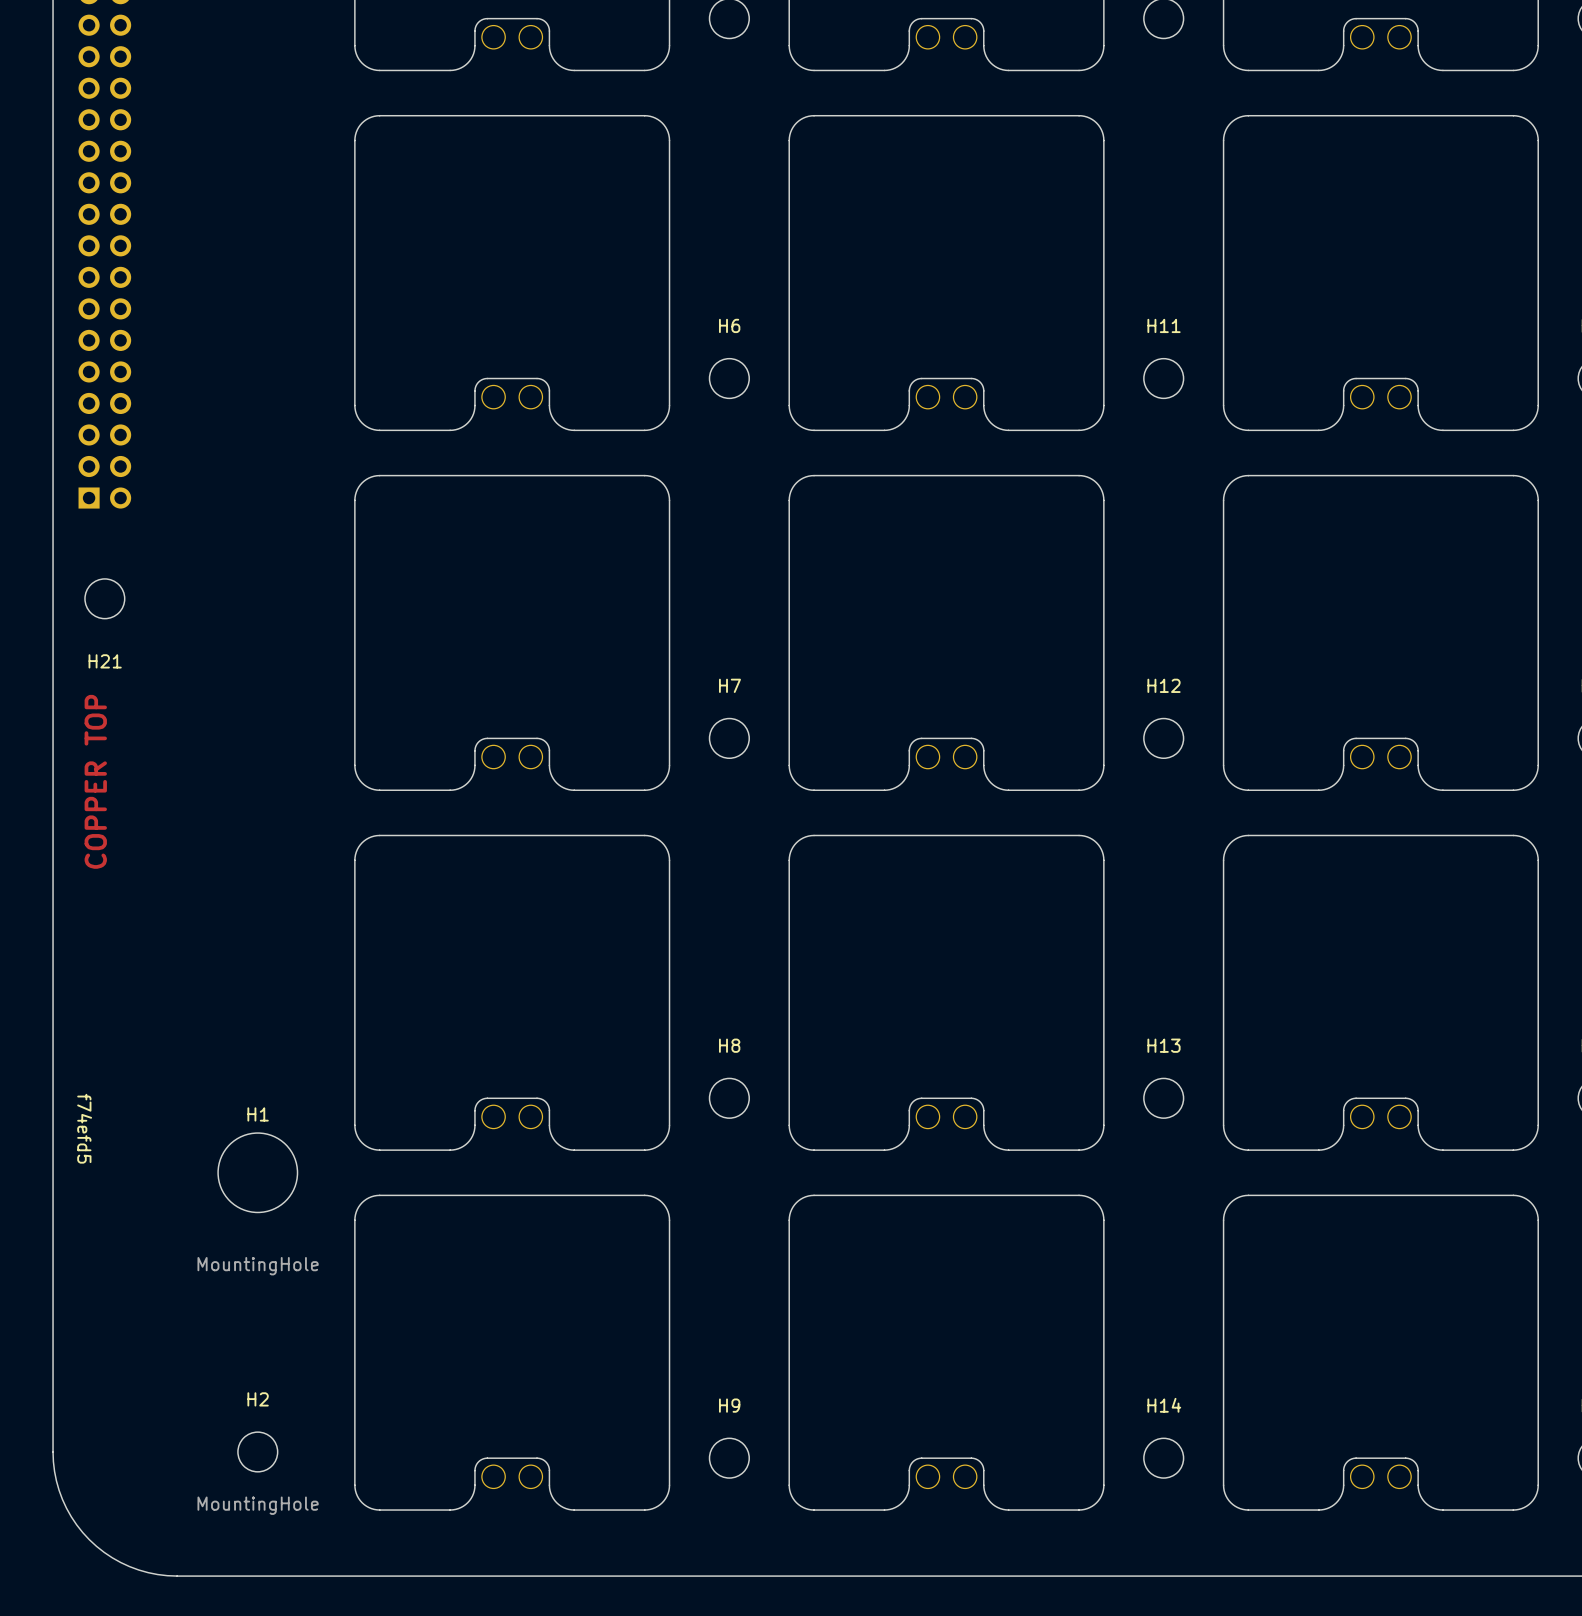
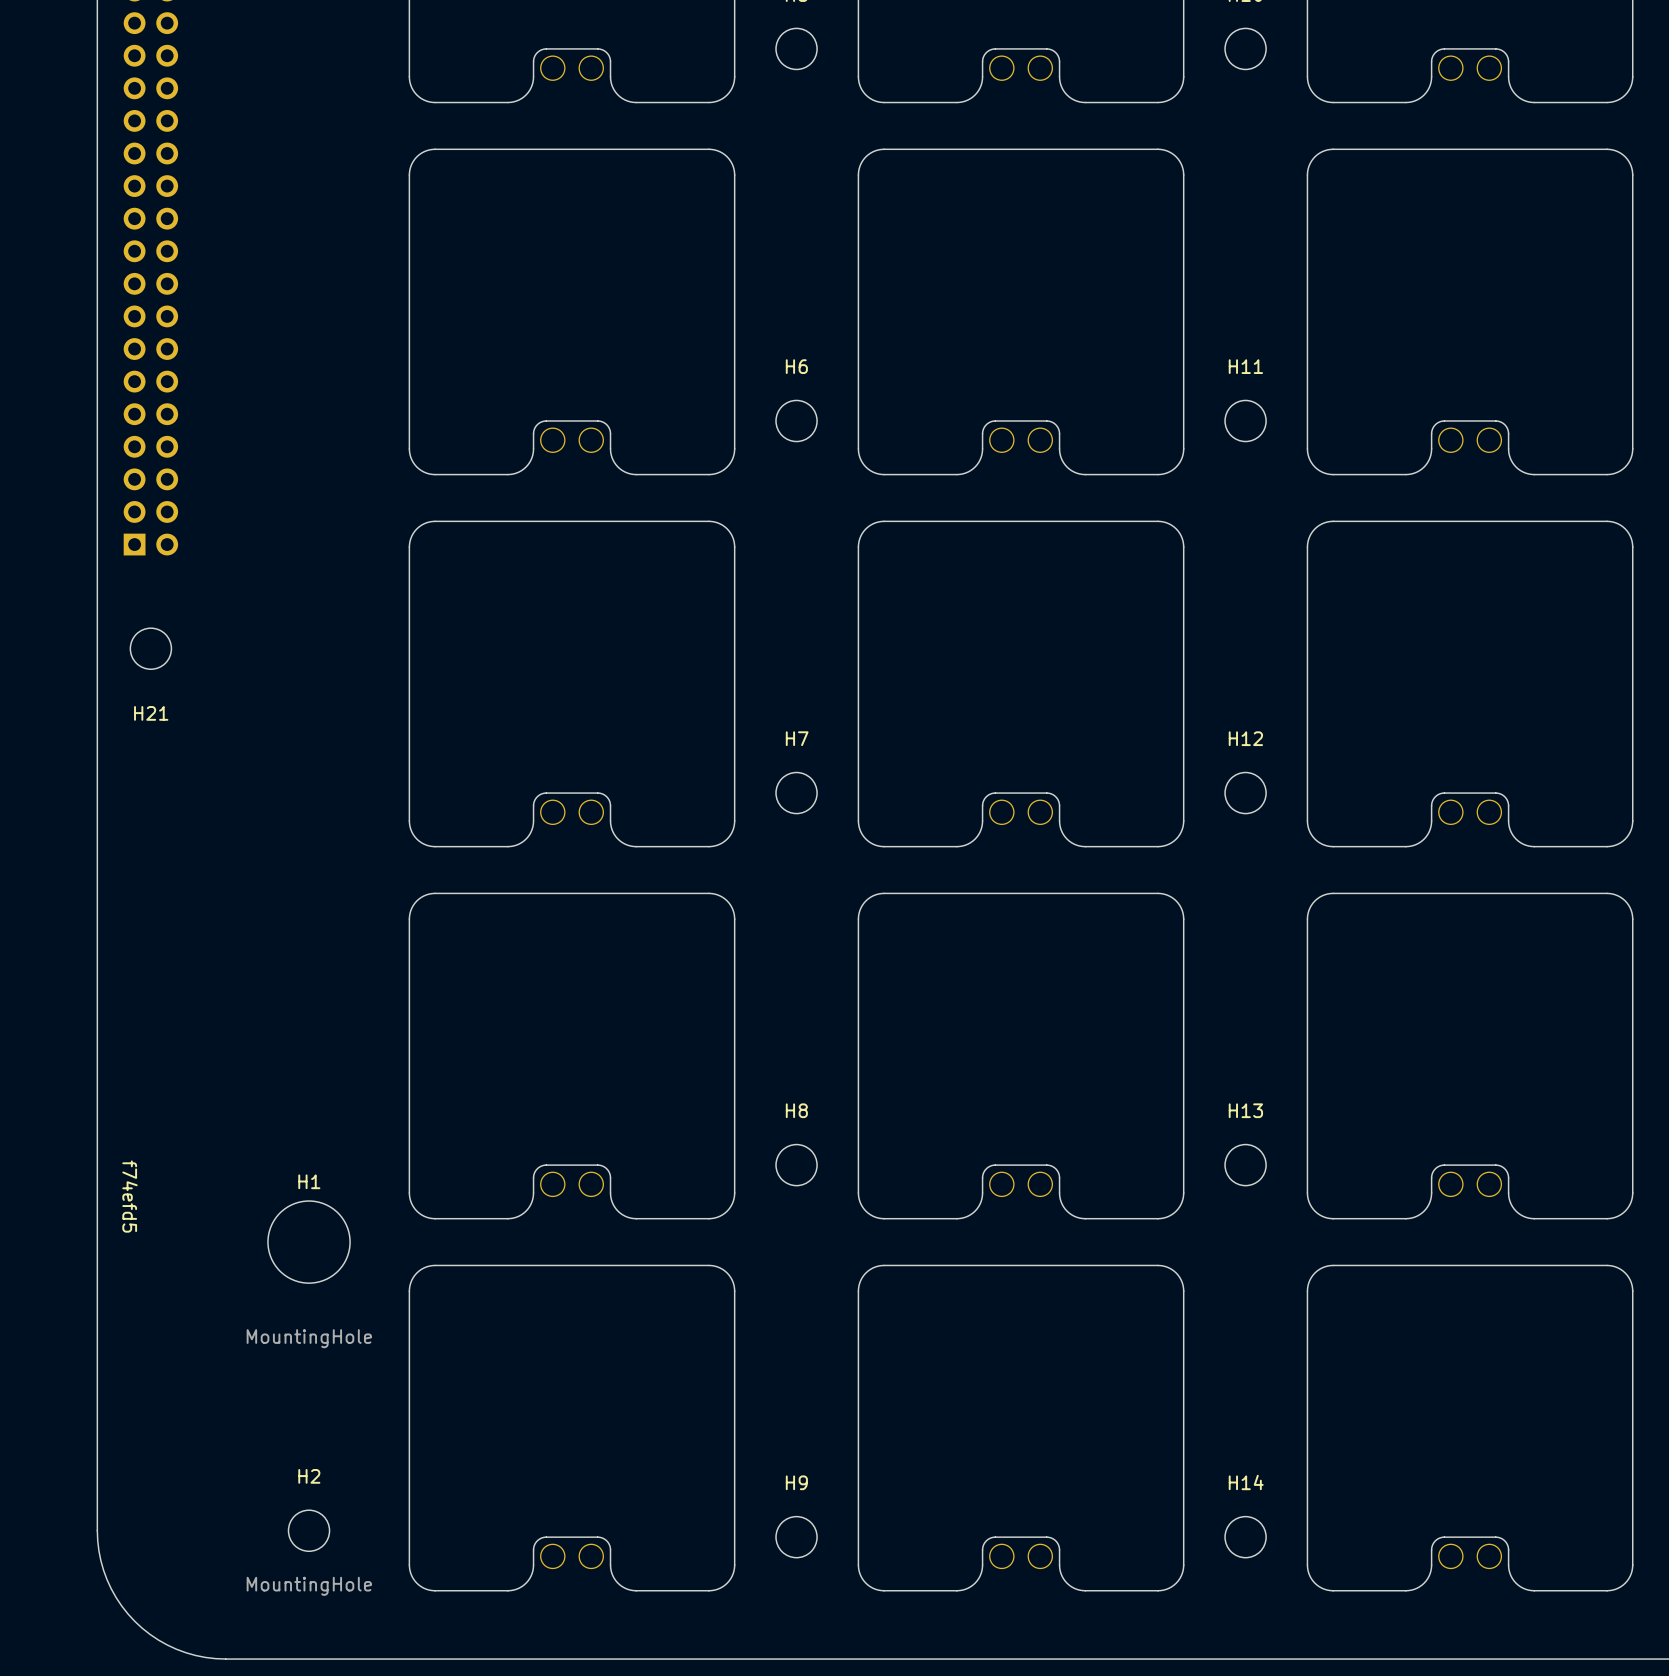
text: COPPER TOP (95, 781) -> none

